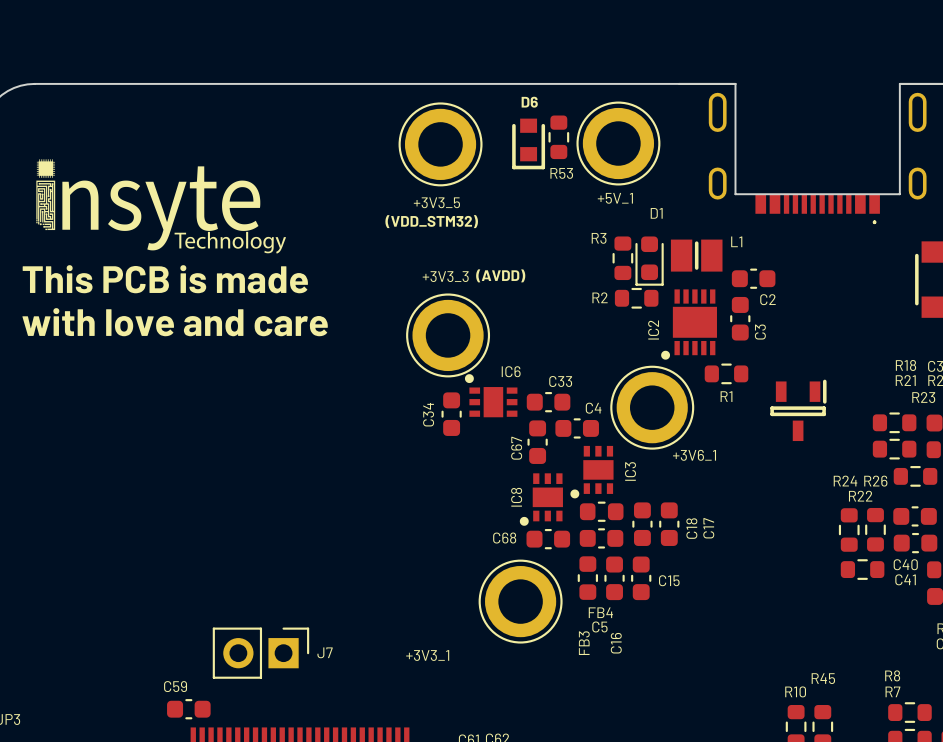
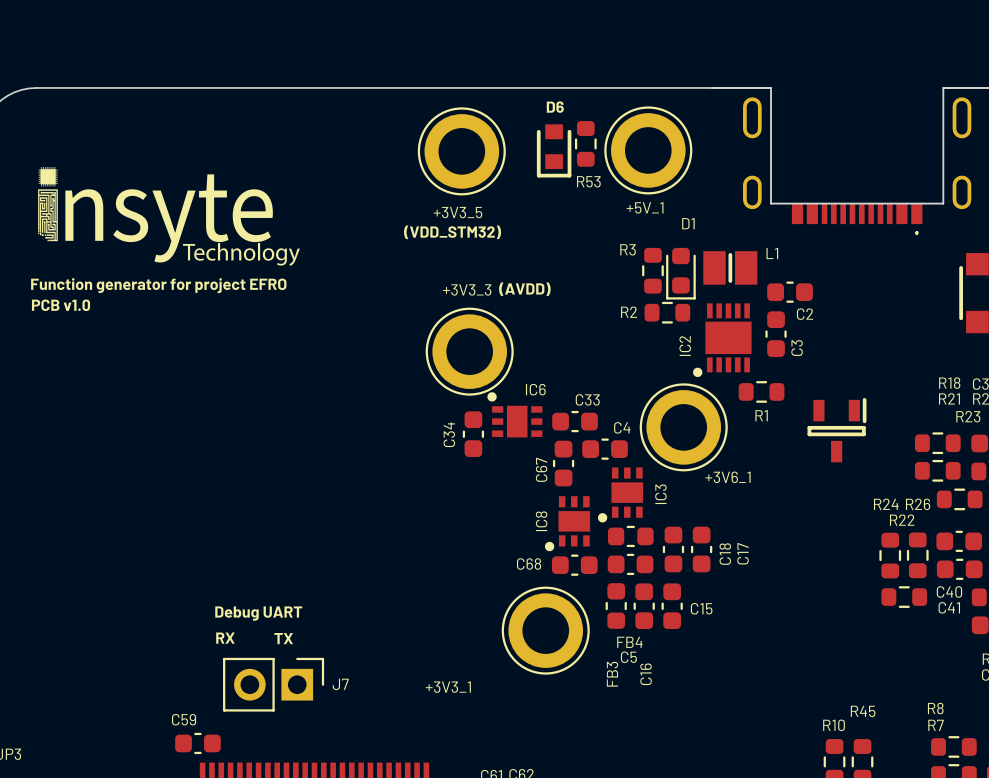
text: none -> Function generator for project EFRO (158, 285)
text: This PCB is made (165, 279) -> PCB v1.0 (61, 305)
text: with love and care (175, 322) -> none
text: none -> Debug UART (258, 613)
text: none -> RX (225, 638)
text: none -> TX (283, 638)

